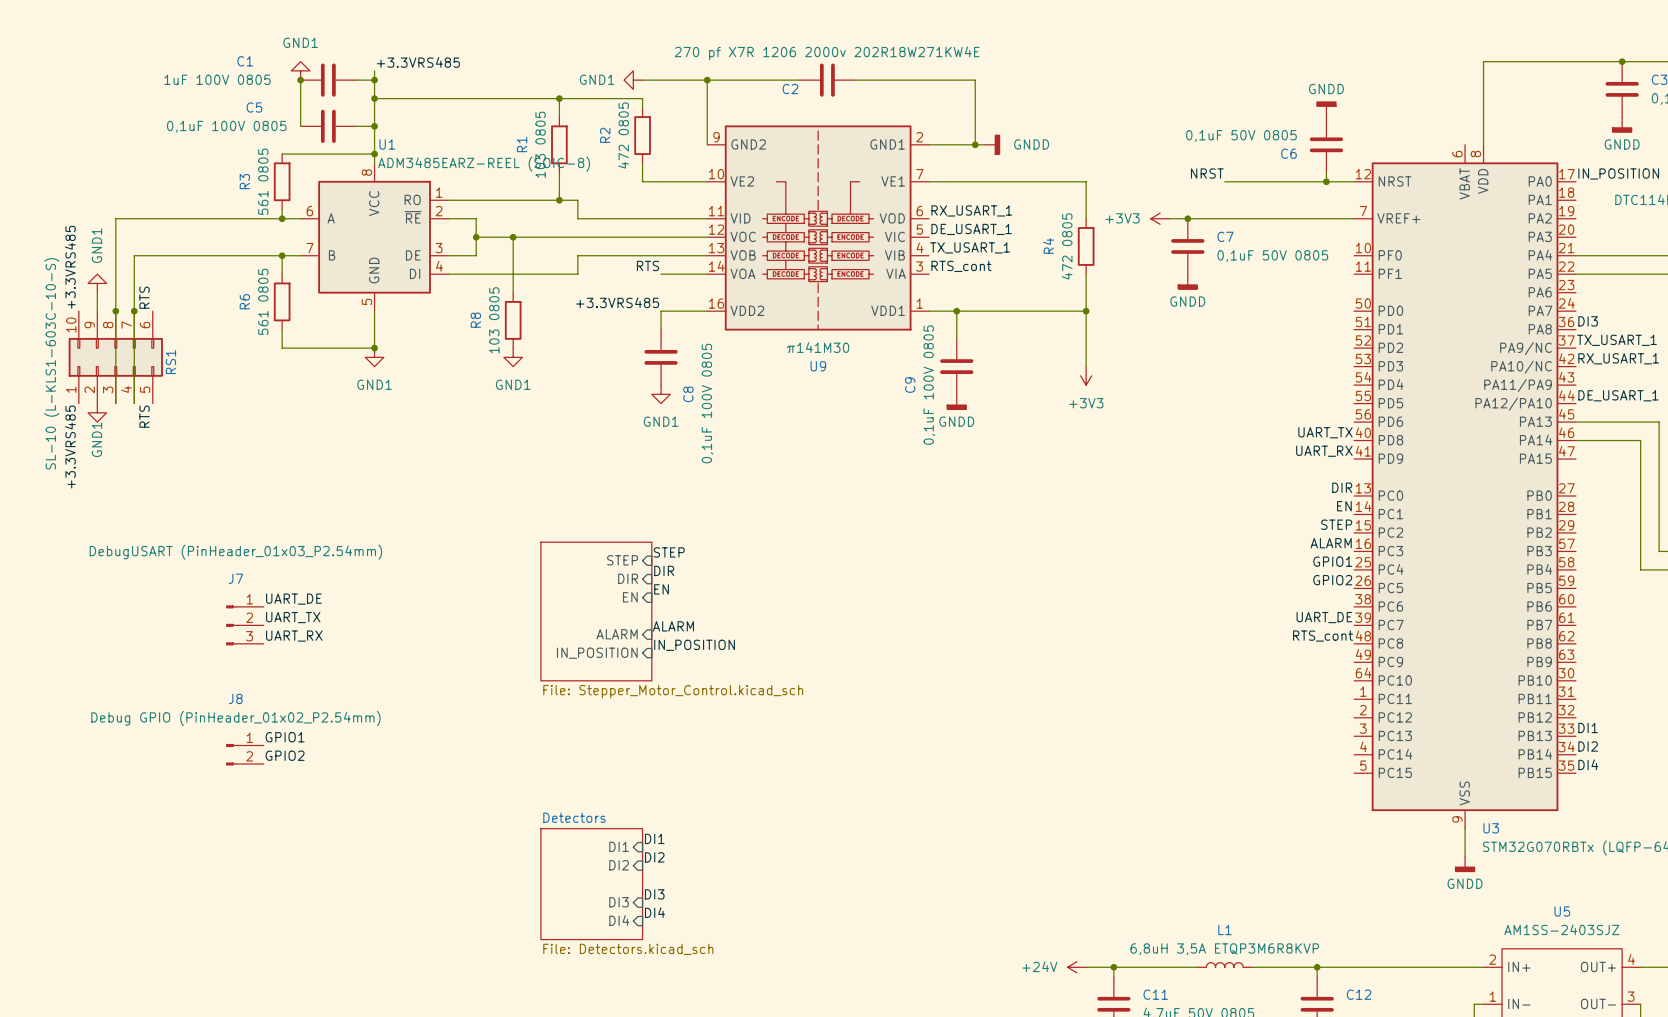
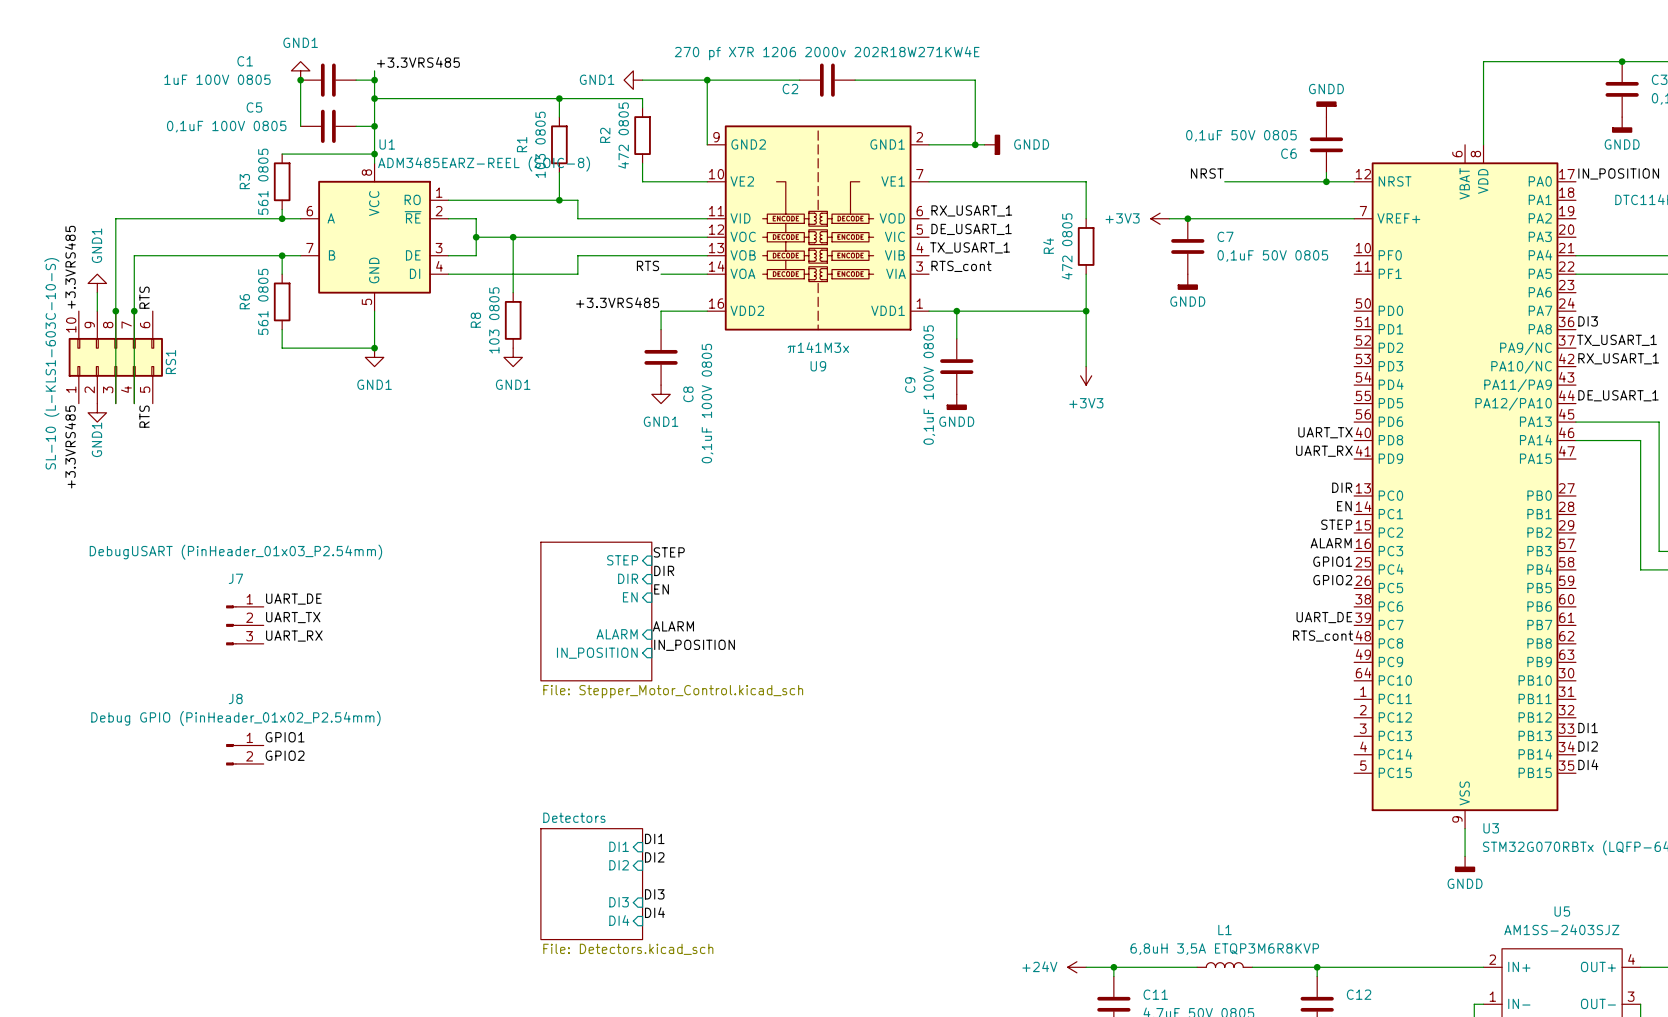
U9 value: π141M30 (818, 347) -> π141M3x (818, 347)

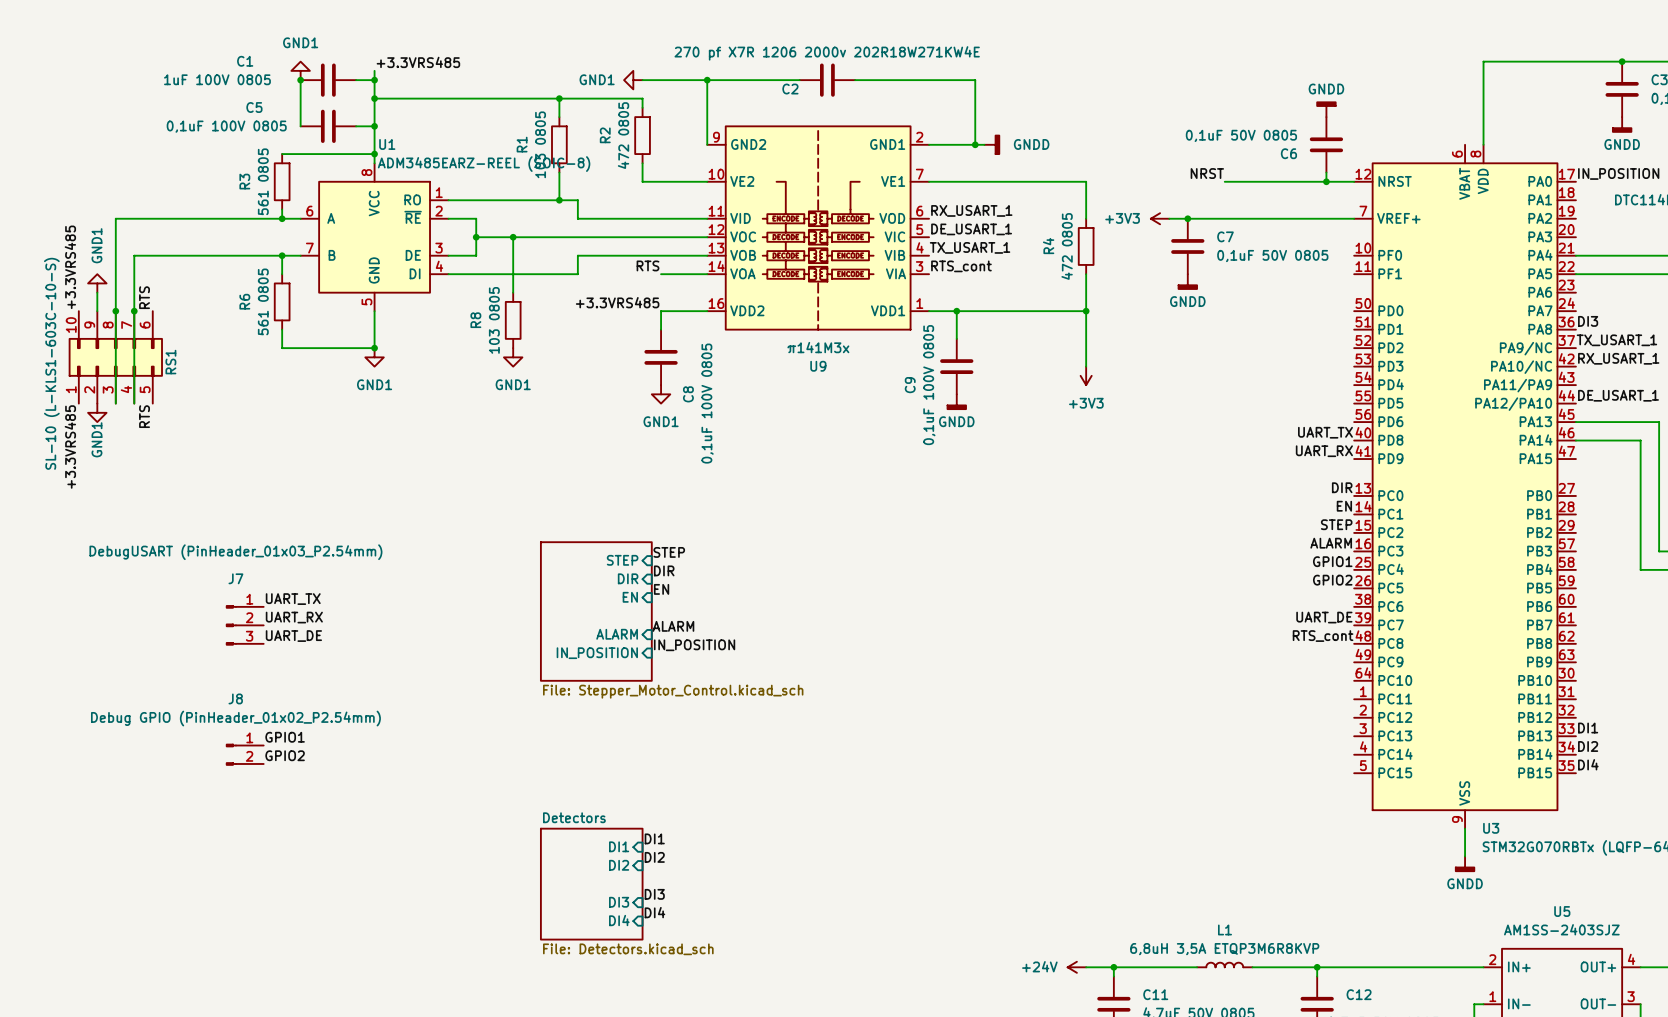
label: UART_DE (293, 599) -> UART_TX (293, 599)
label: UART_TX (293, 617) -> UART_RX (294, 617)
label: UART_RX (294, 636) -> UART_DE (293, 636)

